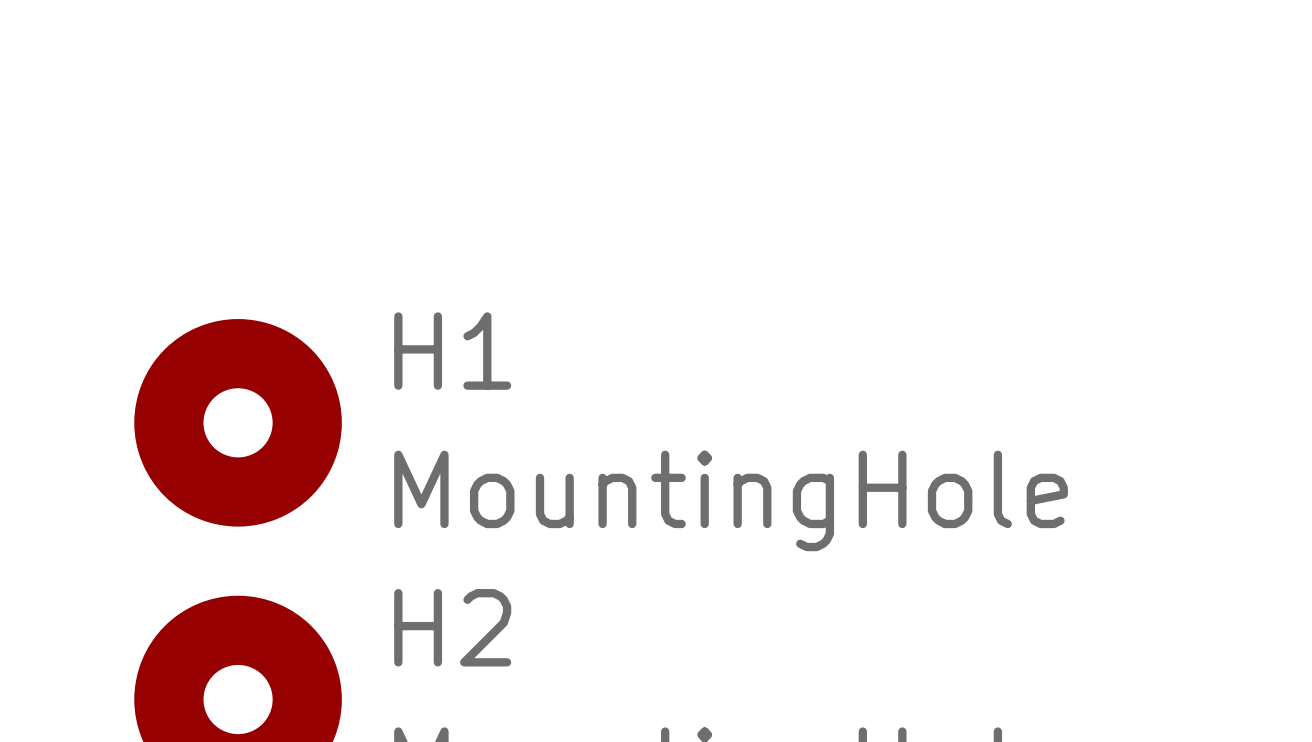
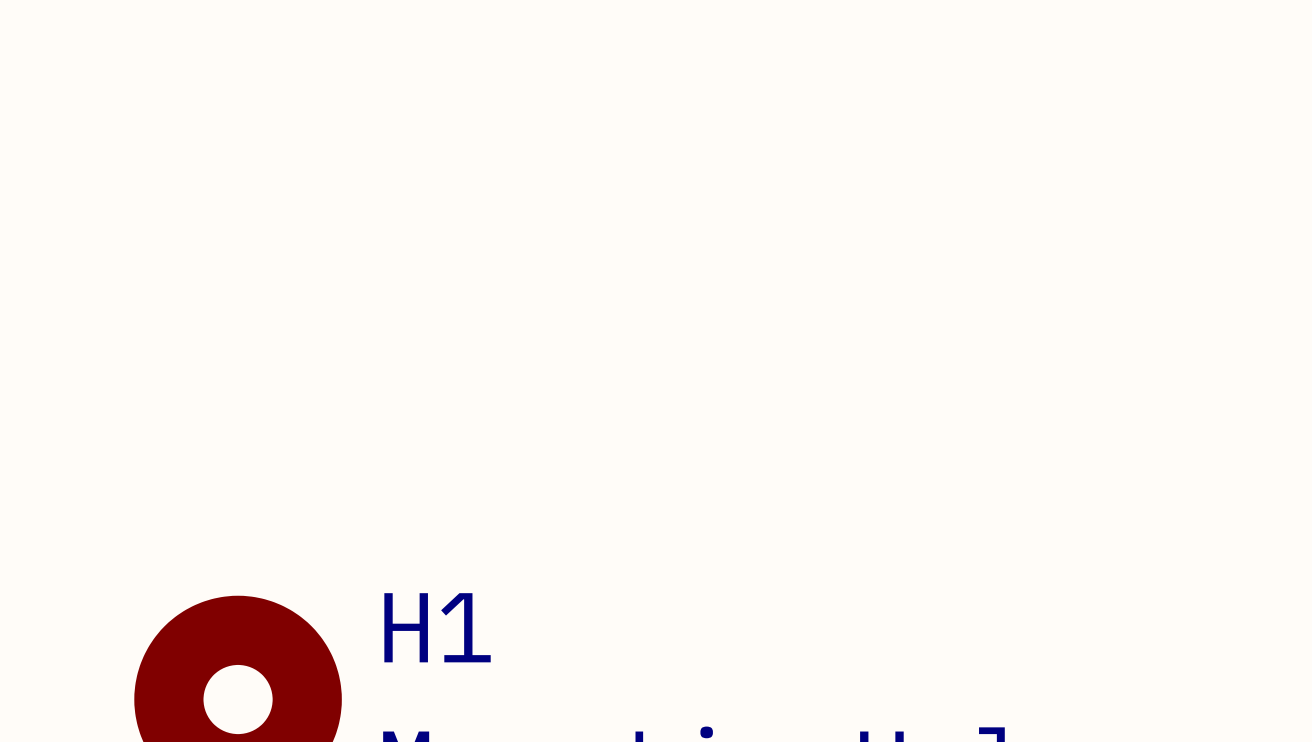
H1: MountingHole (238, 422) -> none
H2 name: H2 (452, 627) -> H1 (437, 627)

